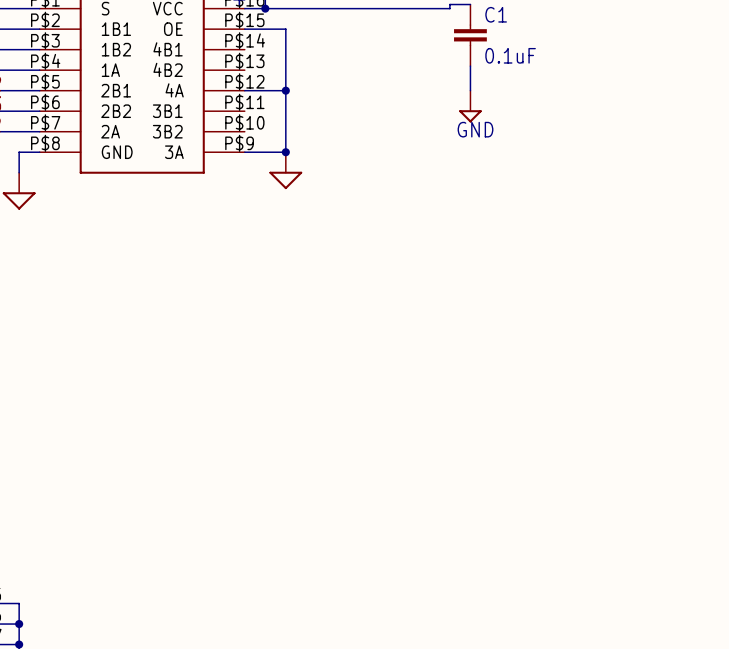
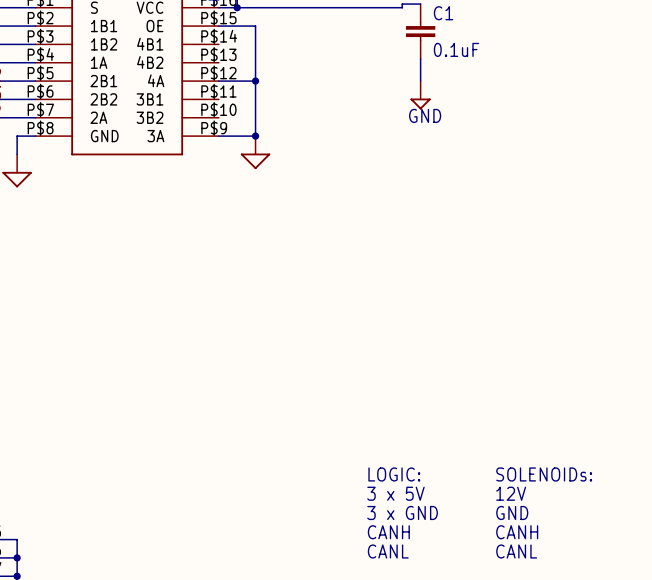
text: none -> LOGIC: (394, 474)
text: none -> SOLENOIDs: (544, 474)
text: none -> 3 x 5V (395, 493)
text: none -> 12V (511, 493)
text: none -> 3 x GND (402, 512)
text: none -> GND (512, 512)
text: none -> CANH (388, 532)
text: none -> CANH (517, 532)
text: none -> CANL (388, 551)
text: none -> CANL (516, 551)

